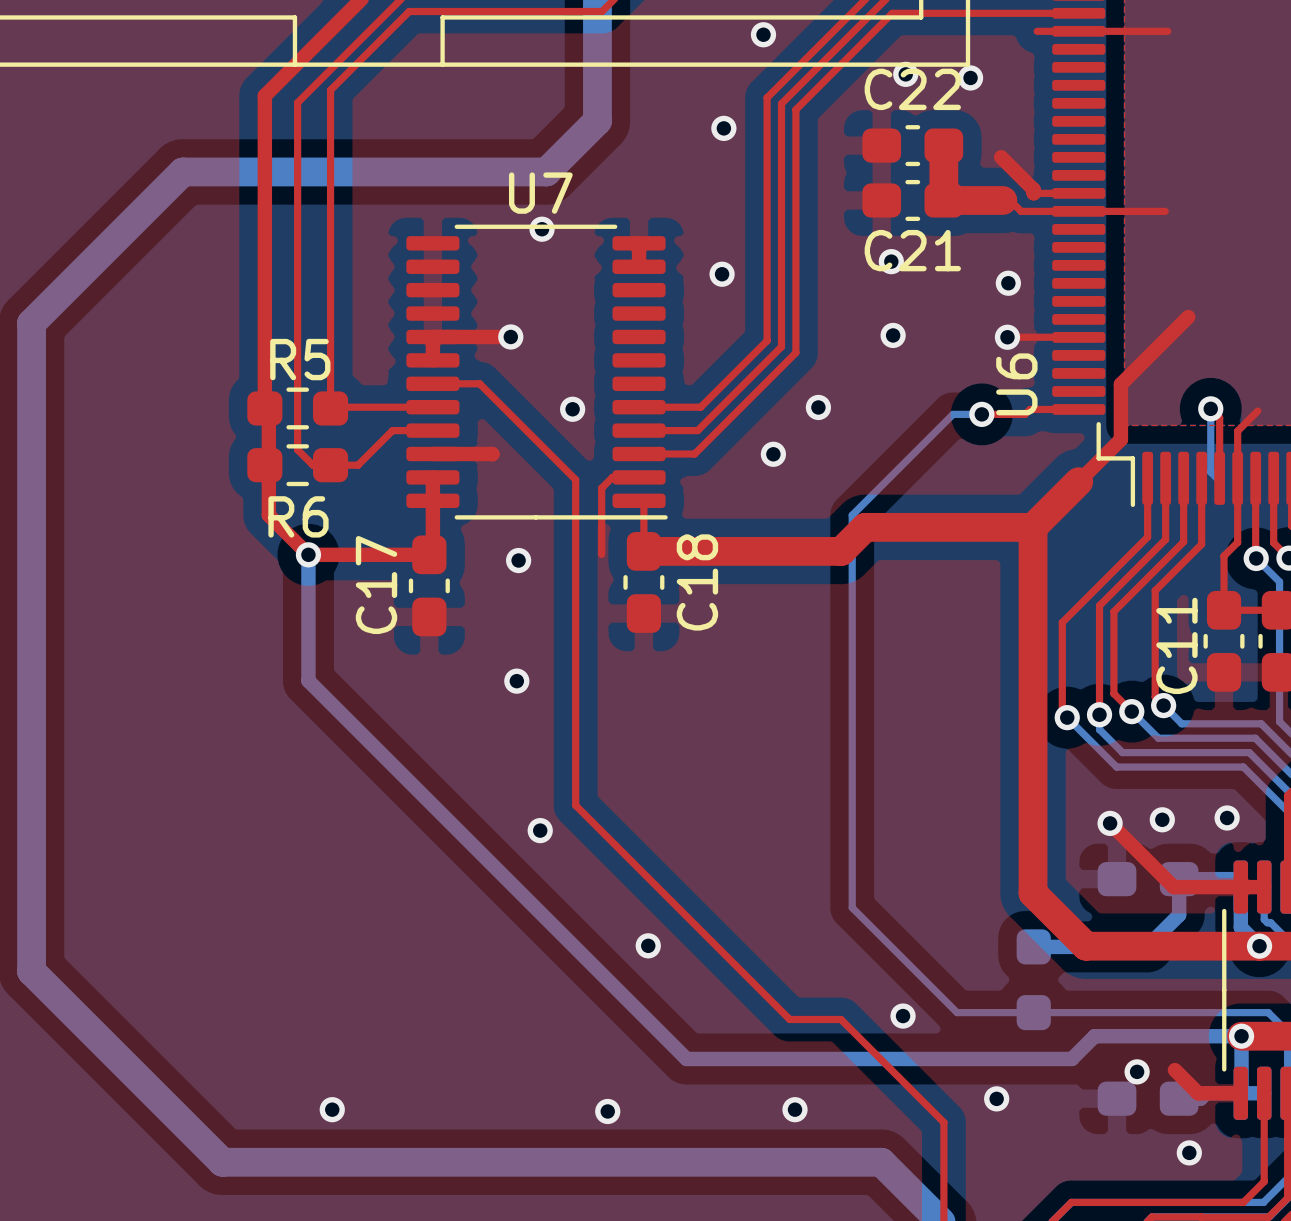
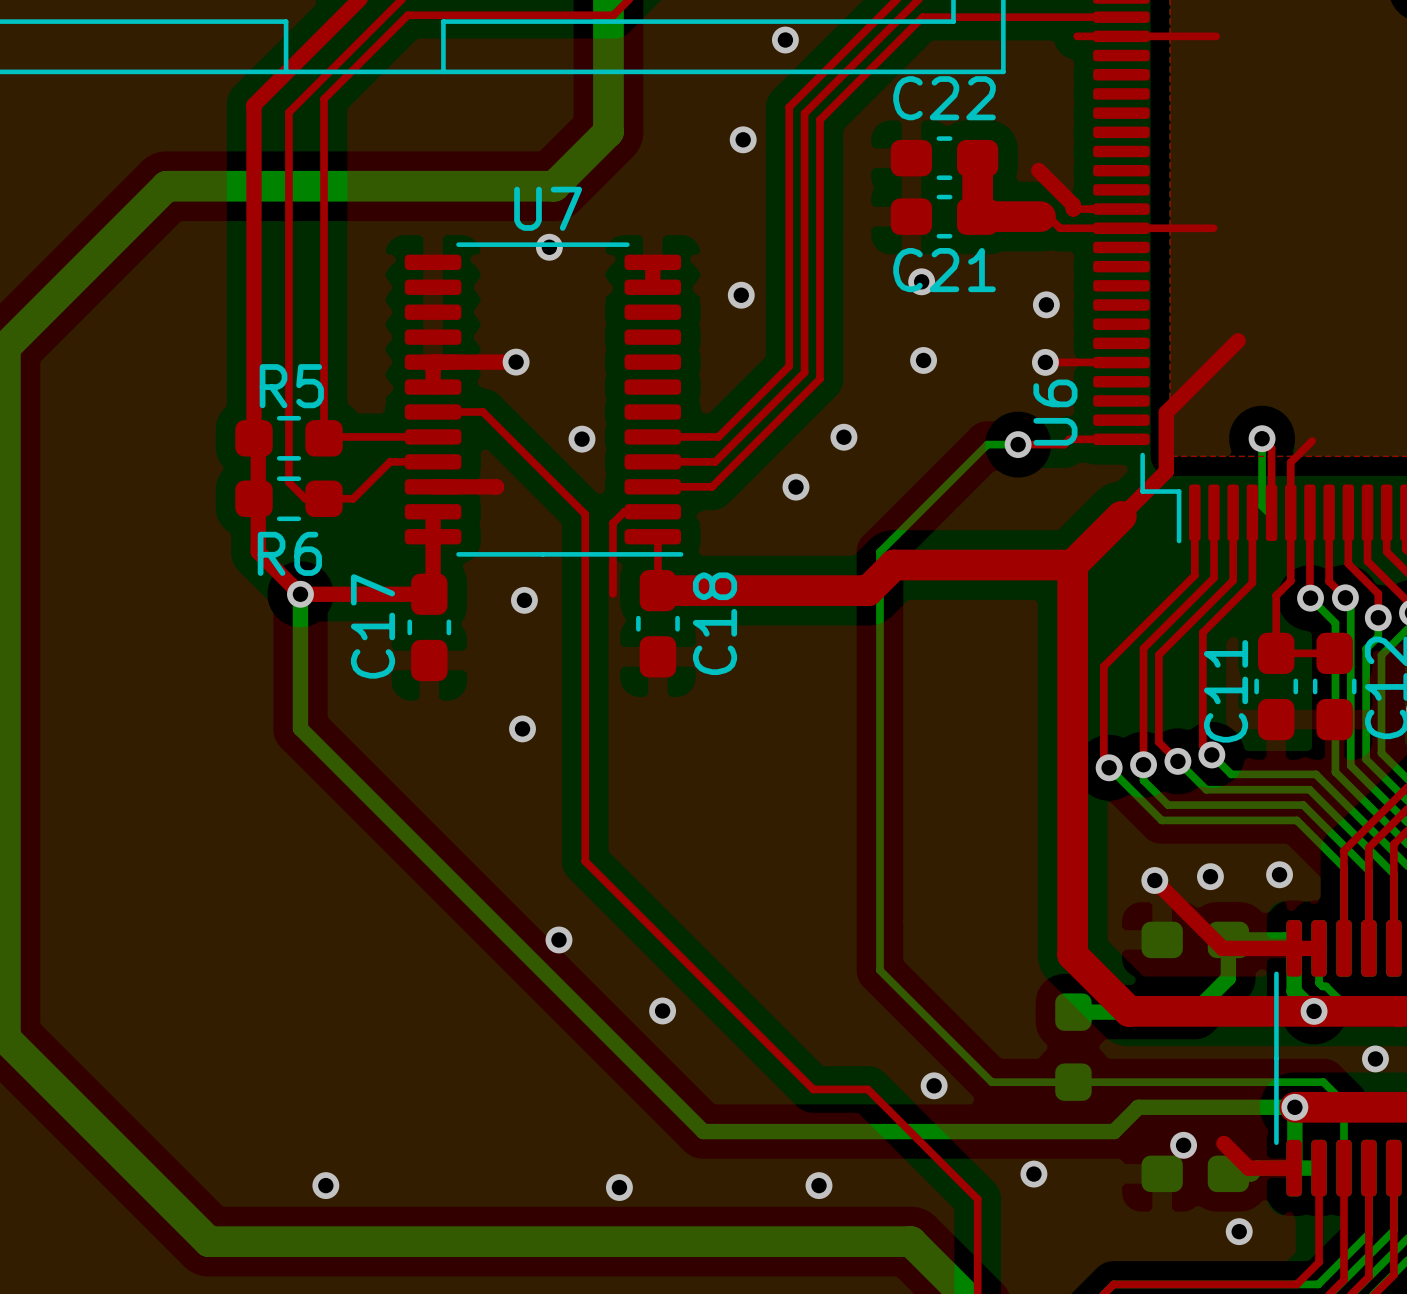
via: (905, 74) -> none
via: (970, 77) -> none
via position: (540, 830) -> (558, 939)

